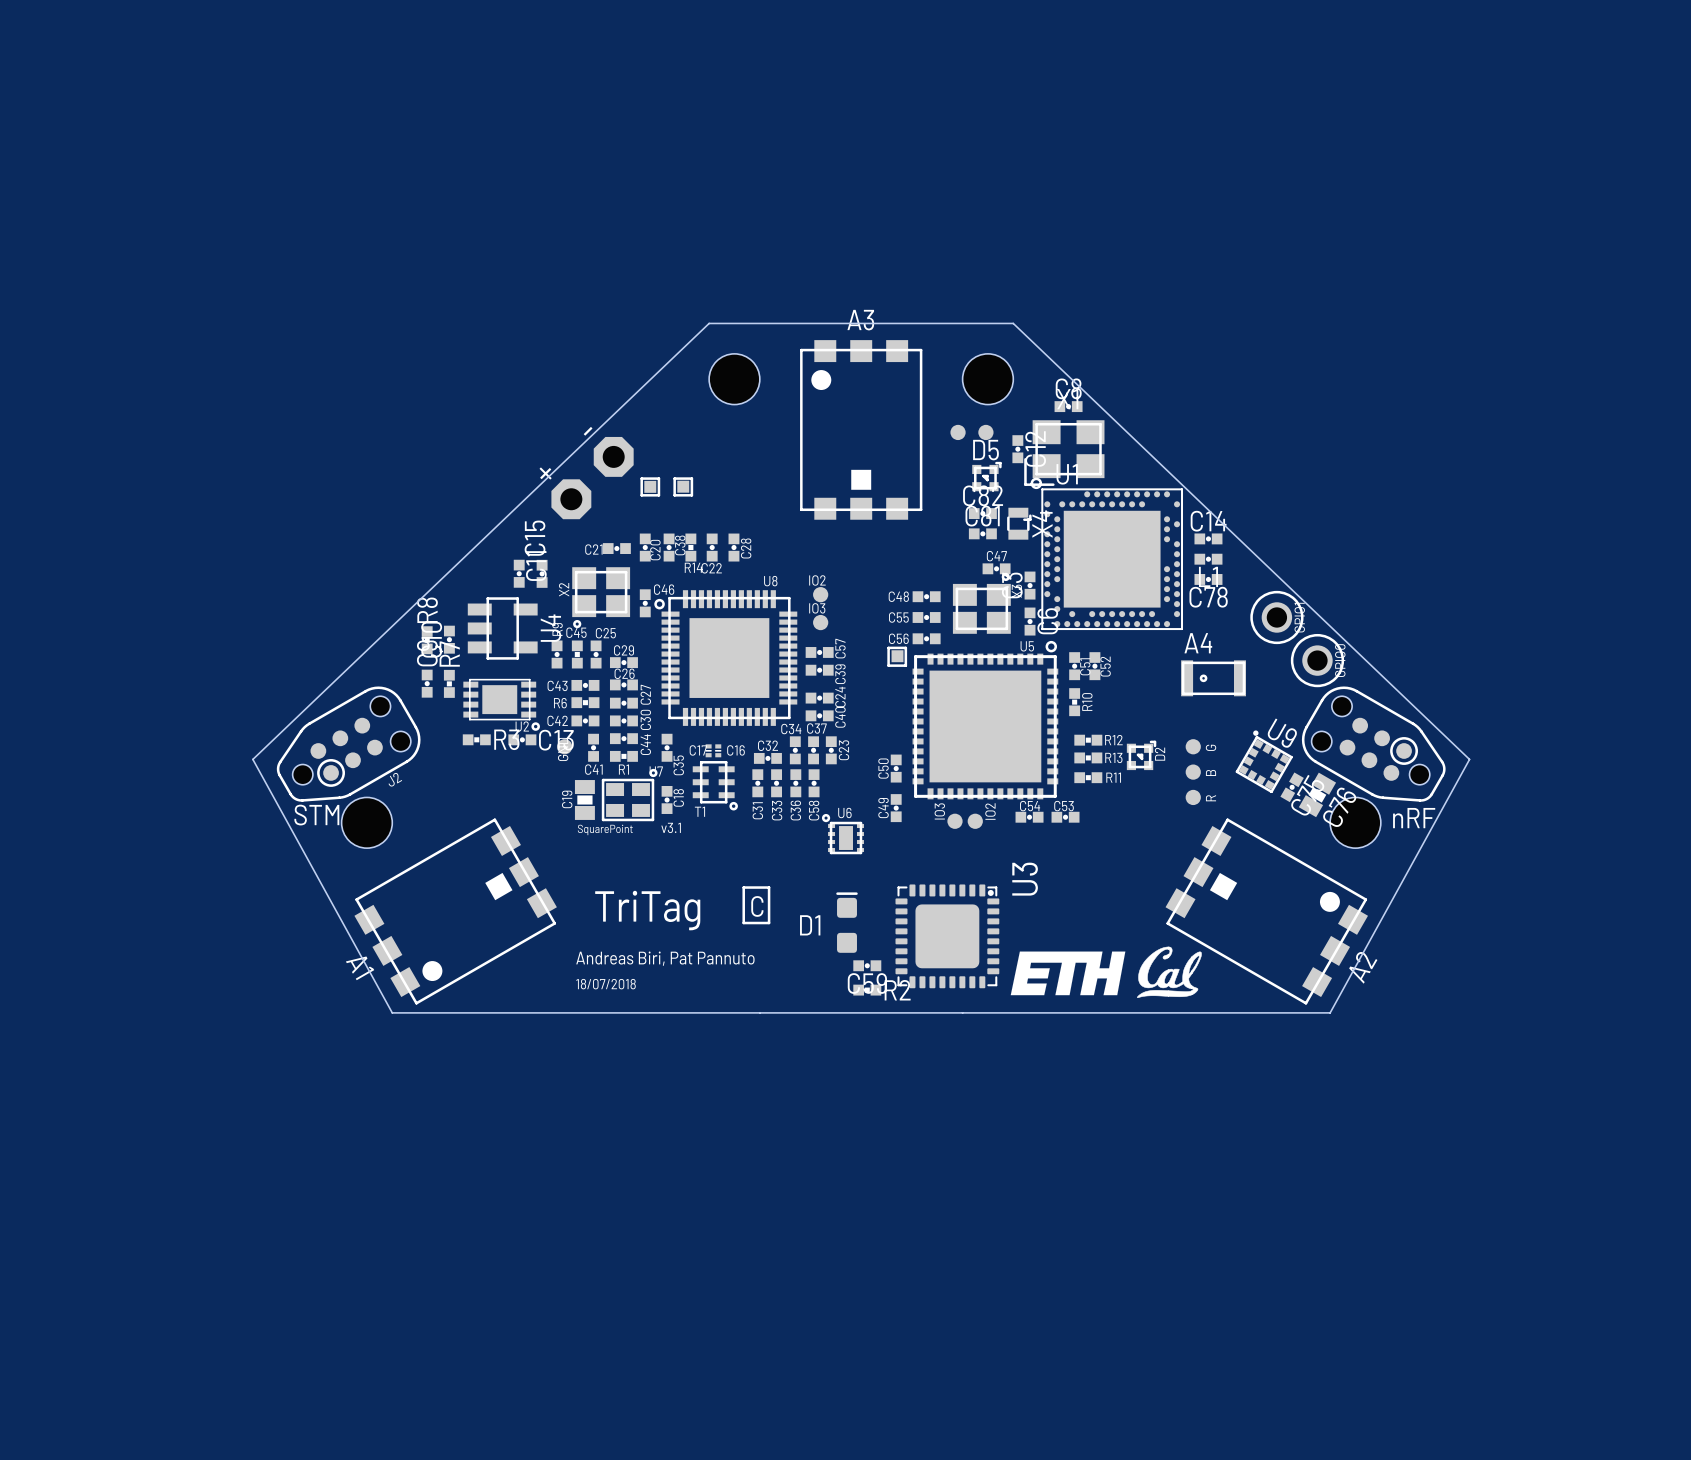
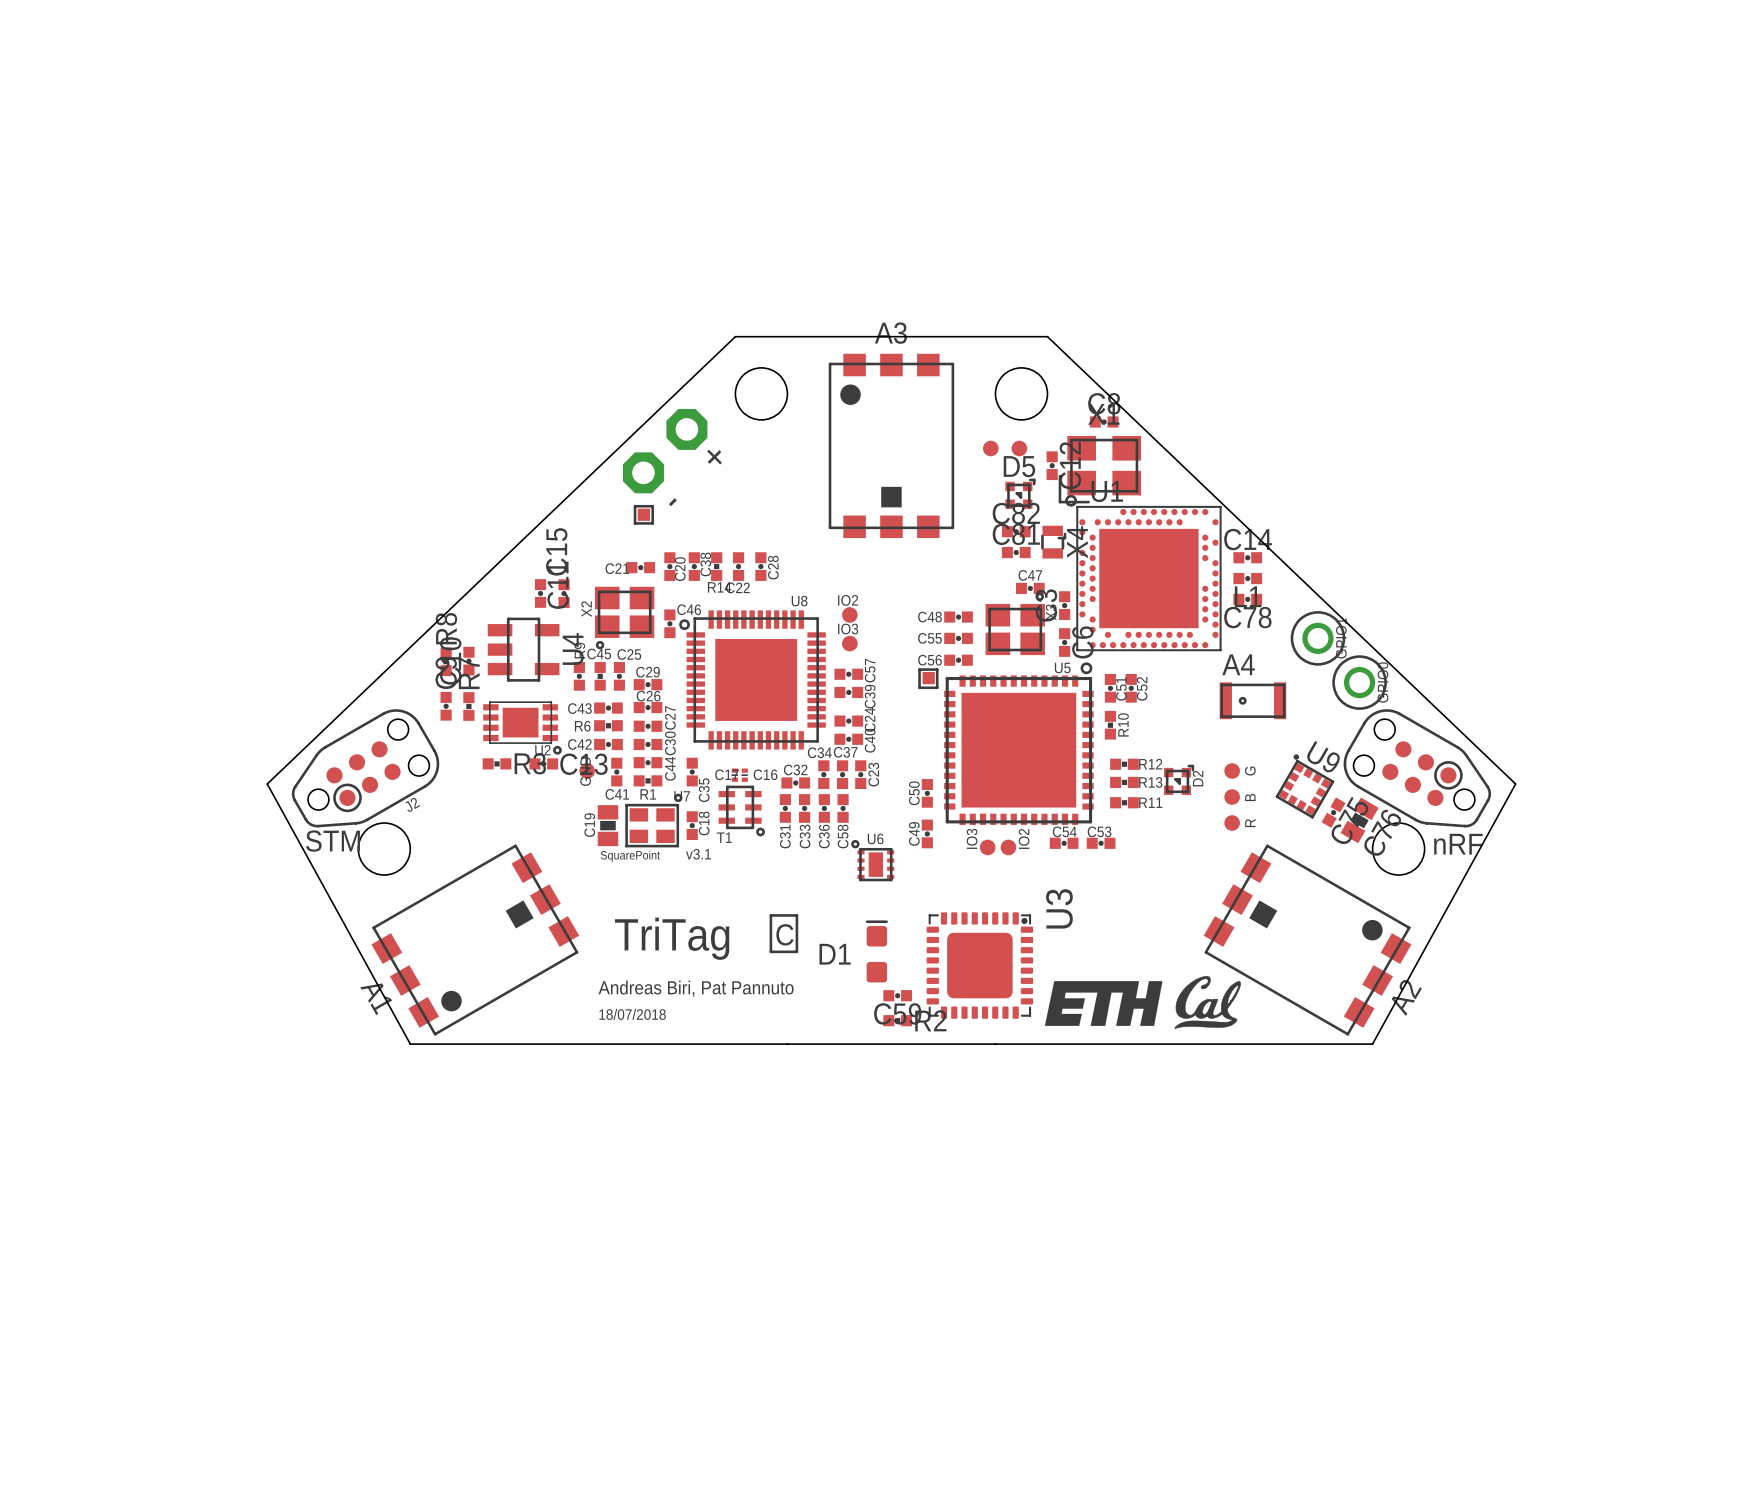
part: none -> (665, 451)
part: (592, 478) -> none
line: (641, 478) (658, 478) (658, 495) (641, 495) (641, 478) -> (635, 506) (652, 506) (652, 523) (635, 523) (635, 506)
line: (674, 478) (691, 478) (691, 495) (674, 495) (674, 478) -> none
part: (650, 486) -> none
part: (683, 486) -> none
part: none -> (643, 514)

